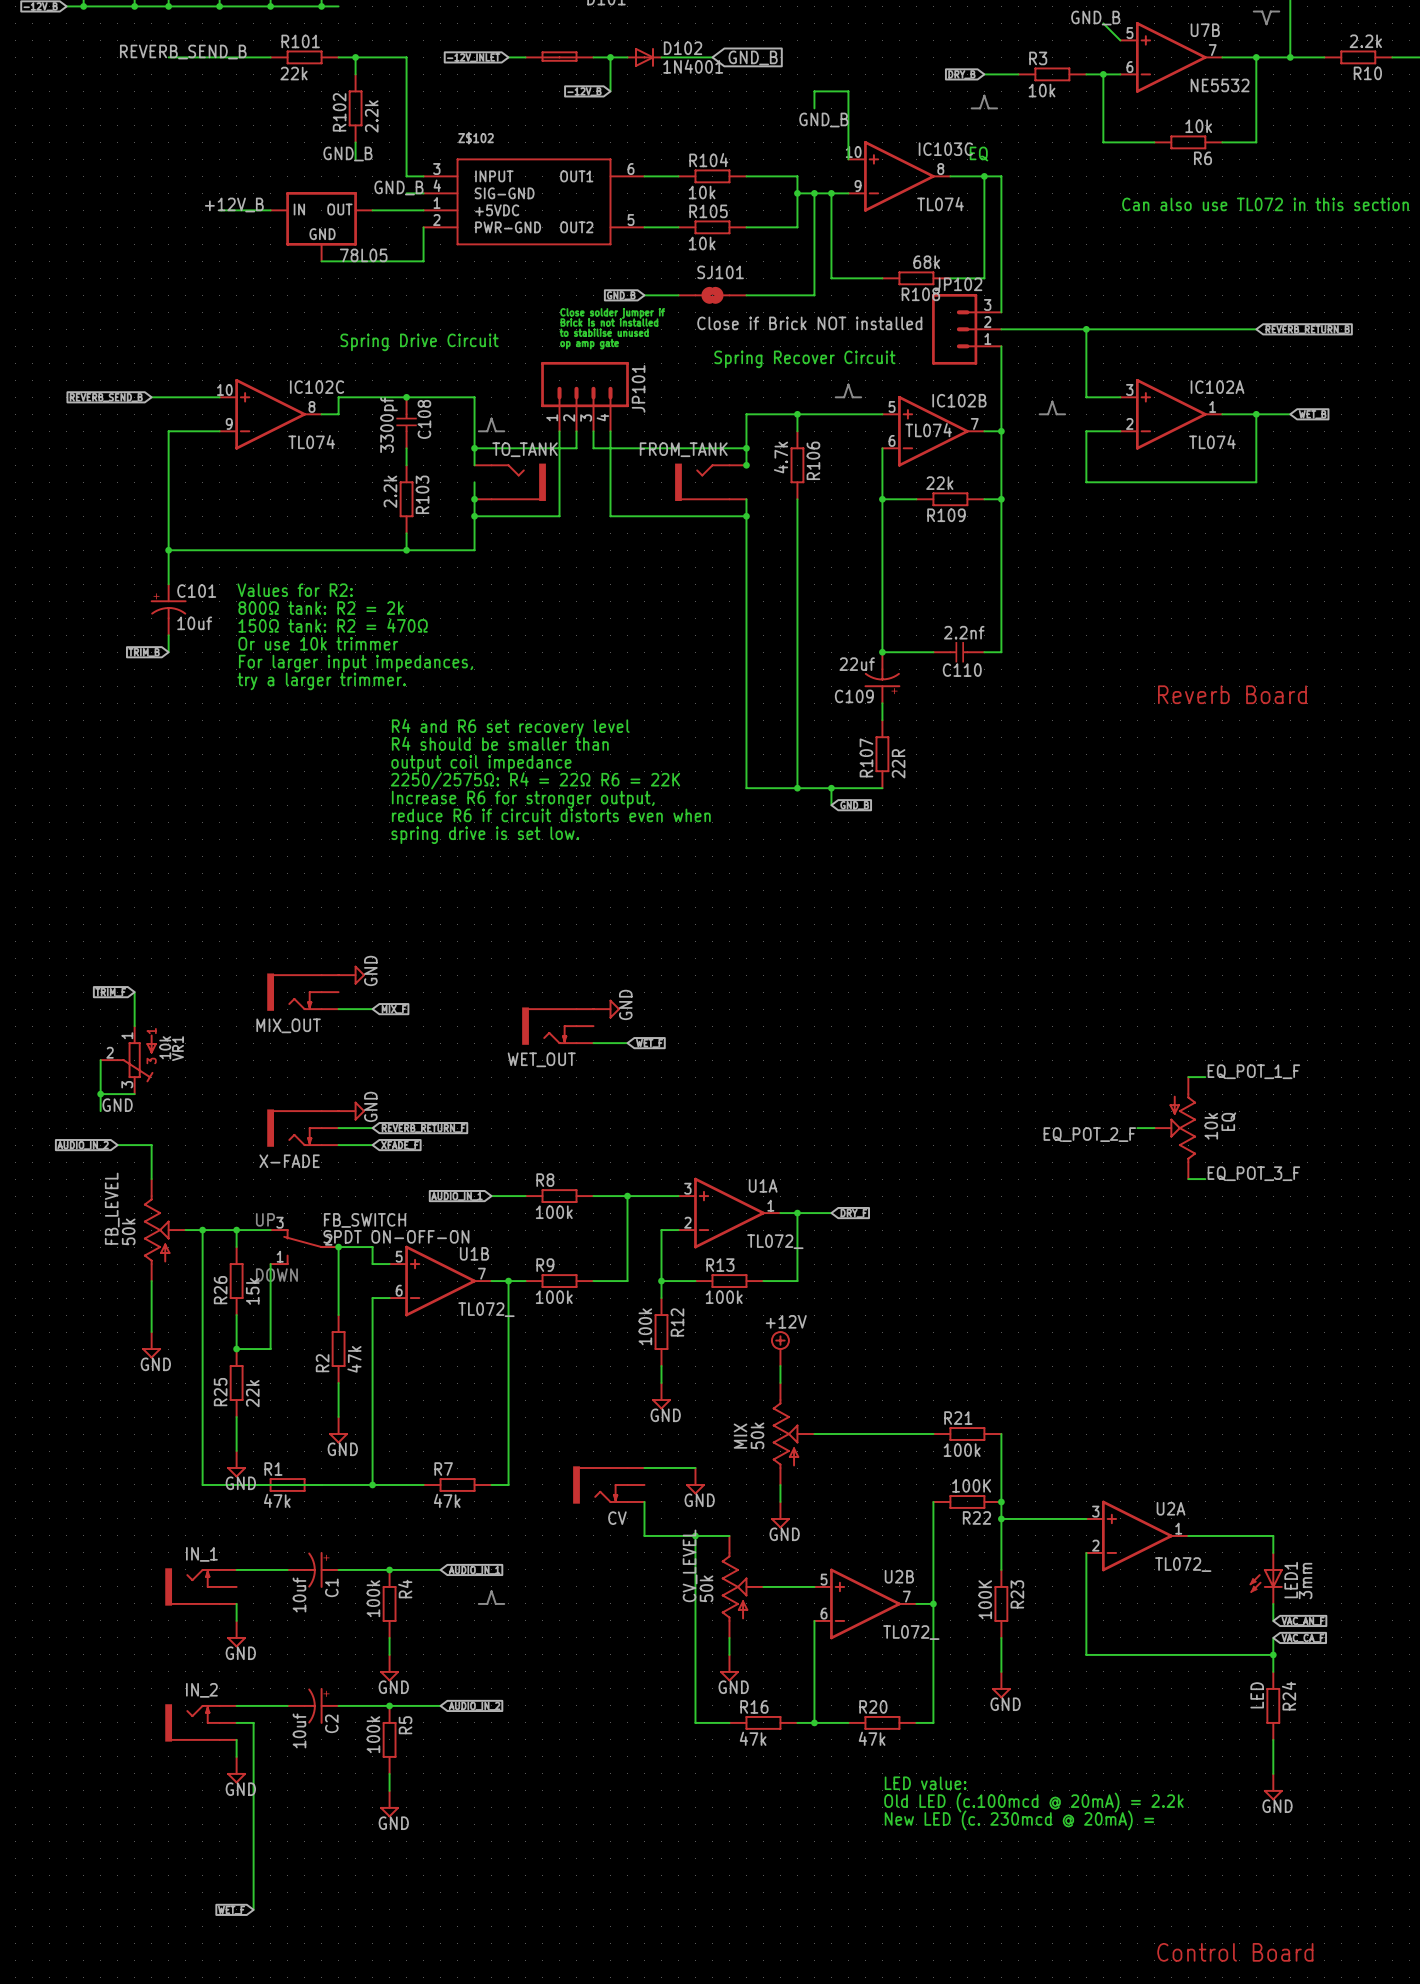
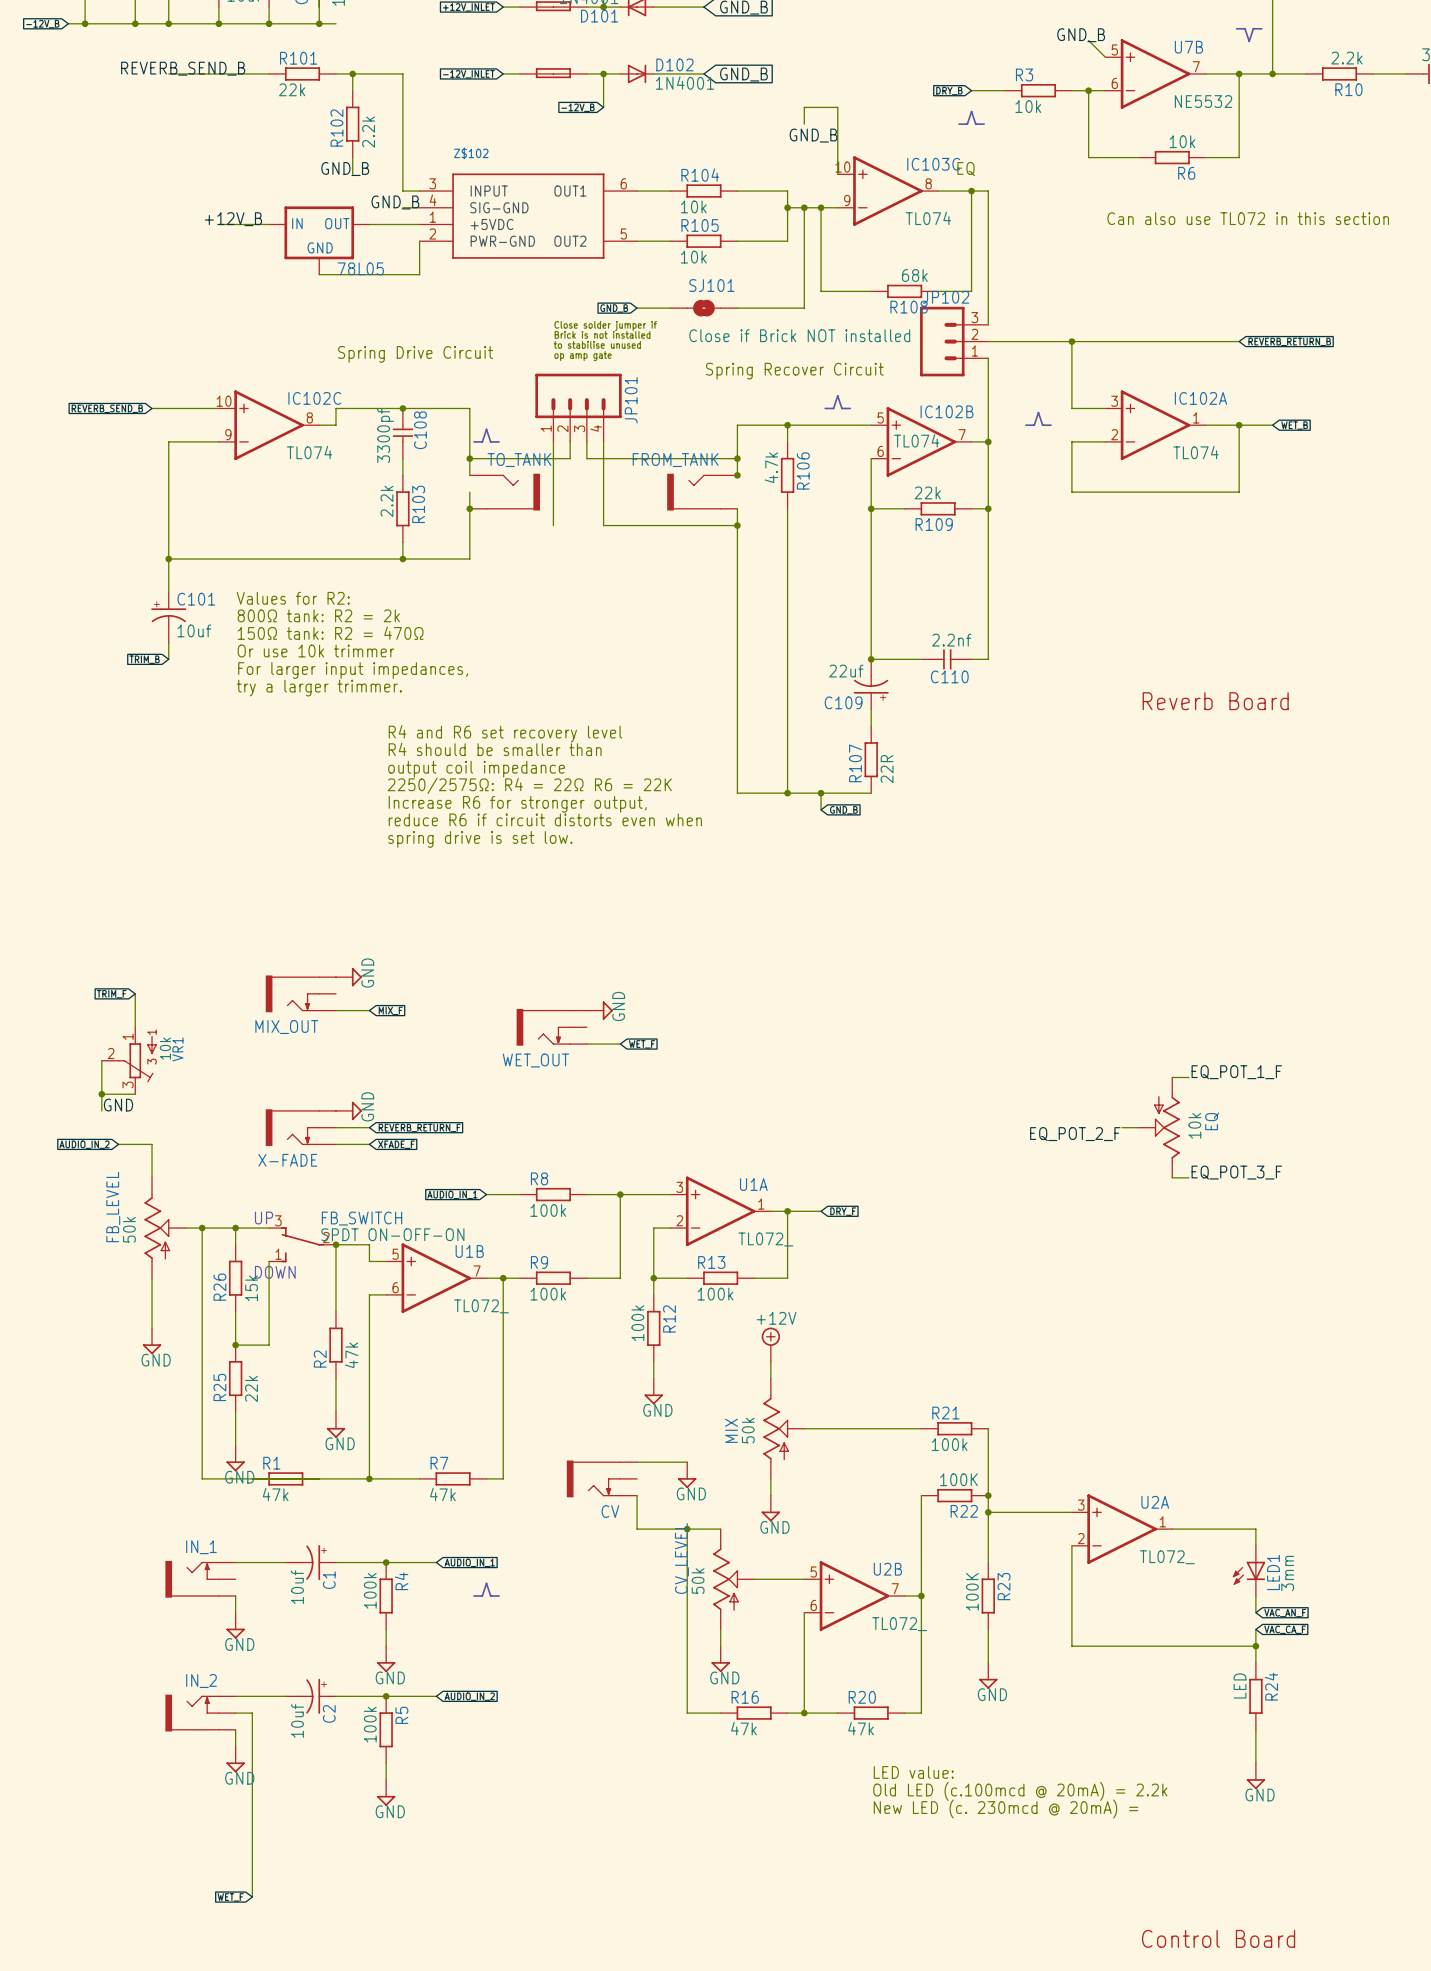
wire: (474, 516) (559, 516) -> none
junction: (474, 516) -> none

